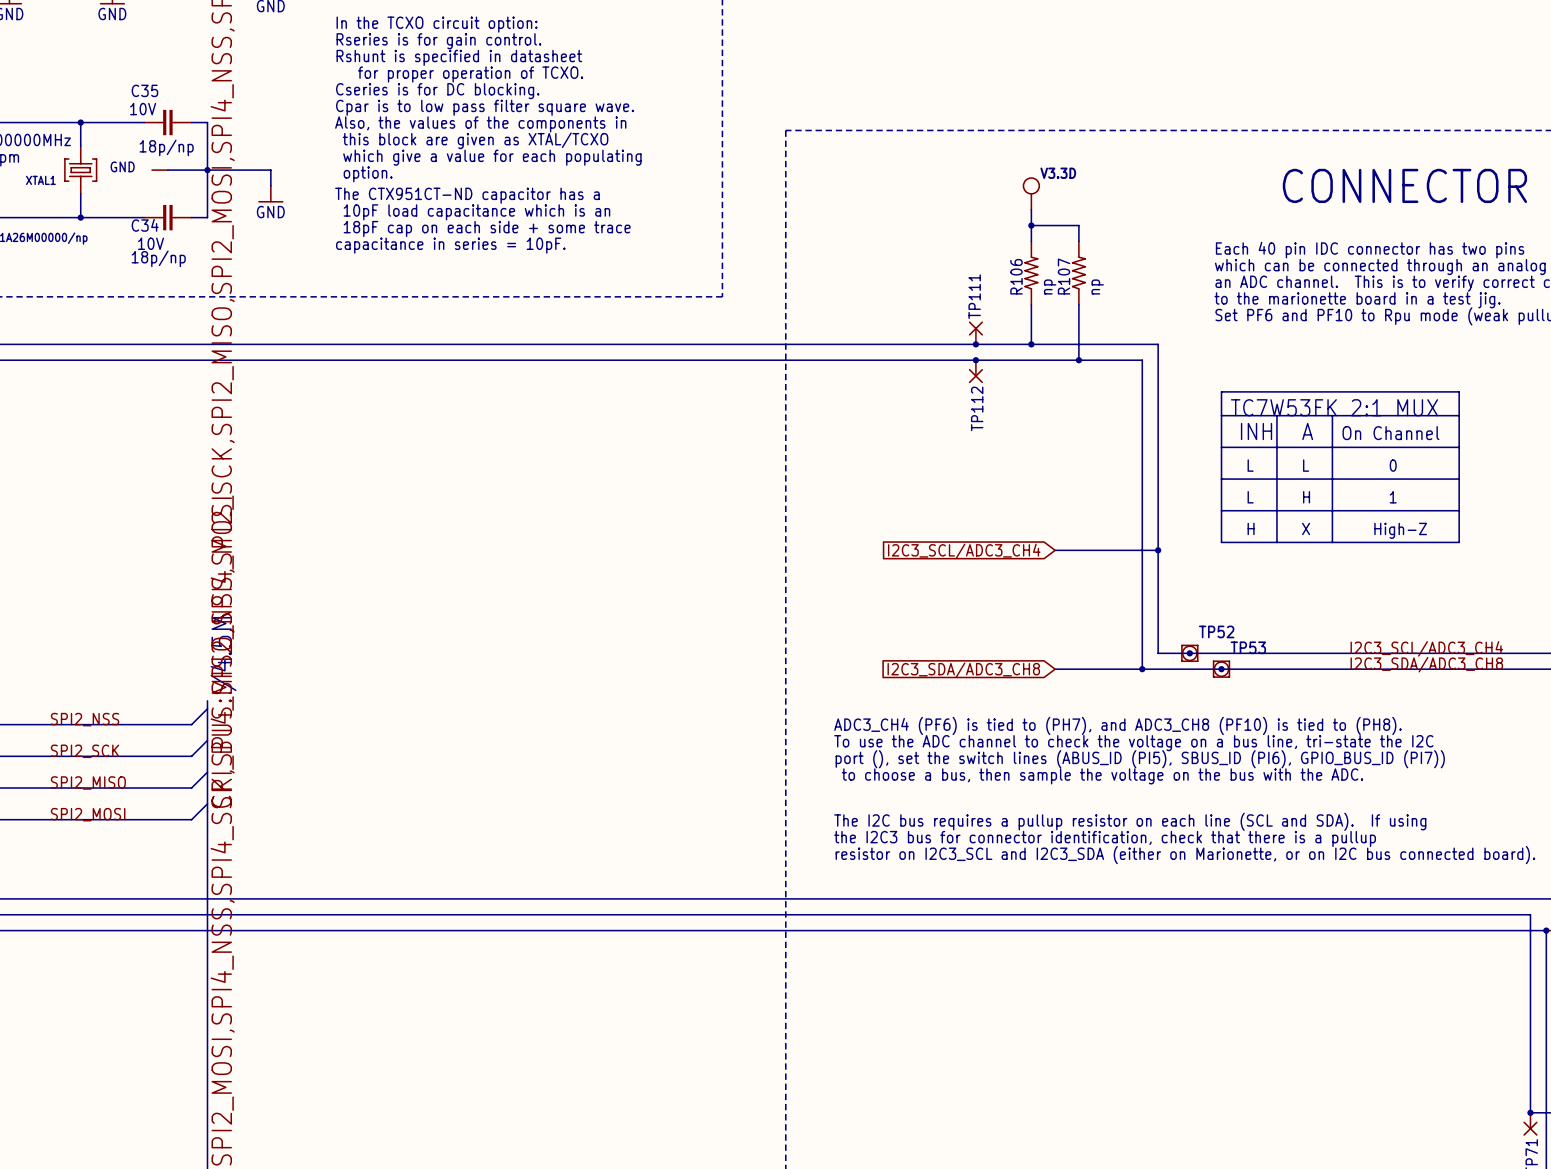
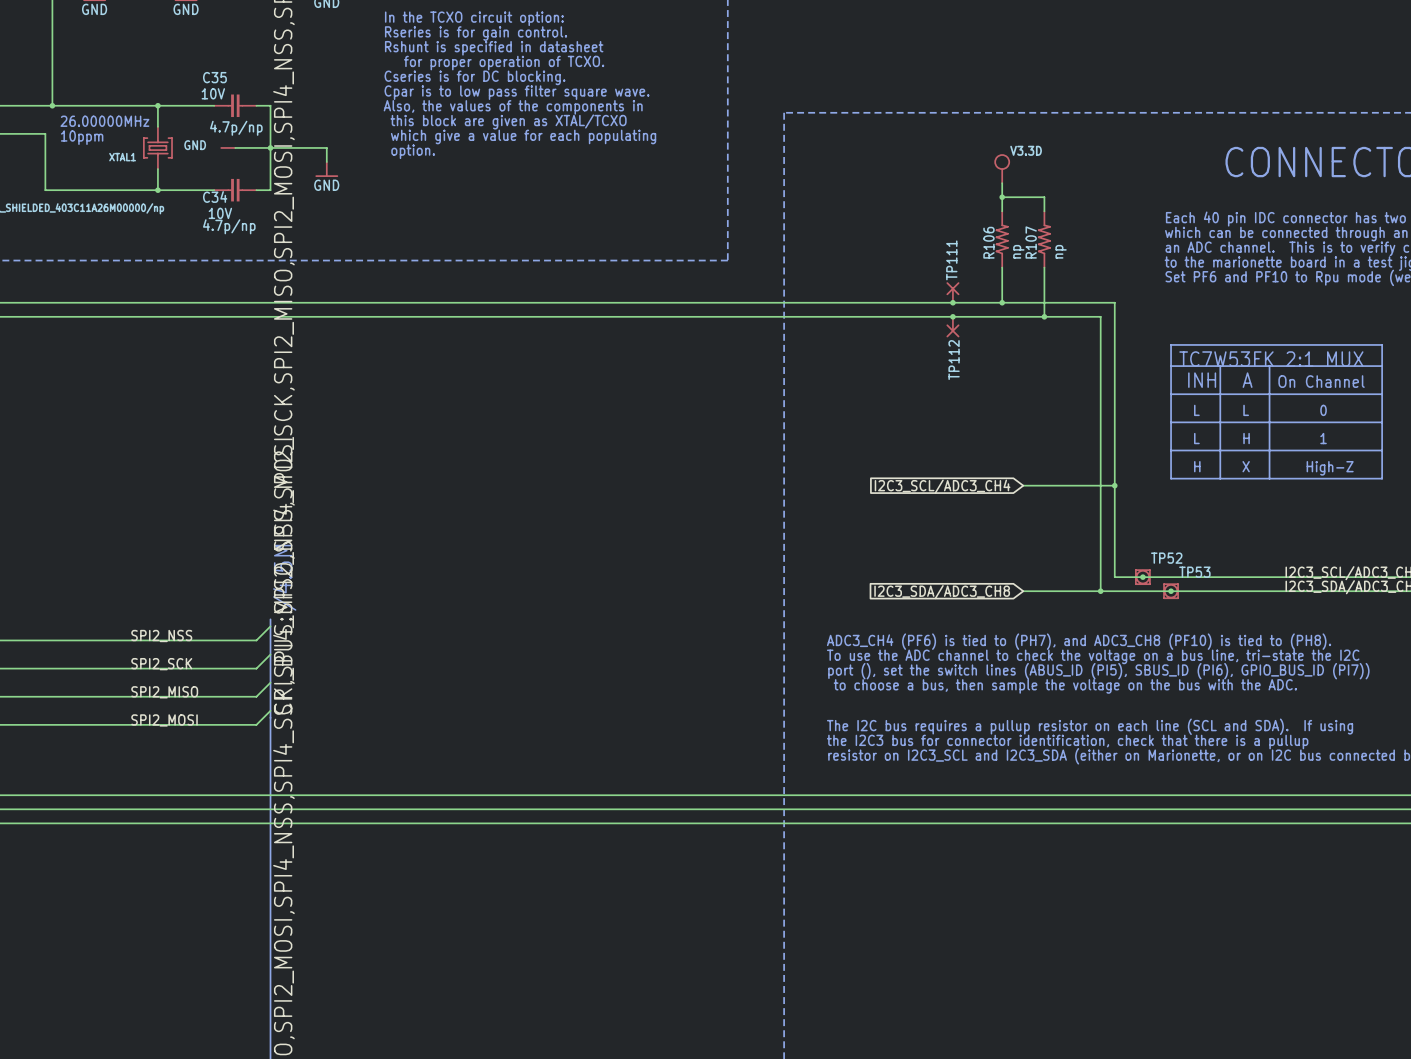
C35 value: 18p/np (166, 147) -> 4.7p/np (236, 128)
text: The CTX951CT-ND capacitor has a (467, 195) -> none
text: 10pF load capacitance which is an (476, 212) -> none
text: 18pF cap on each side + some trace (487, 228) -> none
text: capacitance in series = 10pF. (450, 245) -> none
C34 value: 18p/np (158, 258) -> 4.7p/np (229, 226)

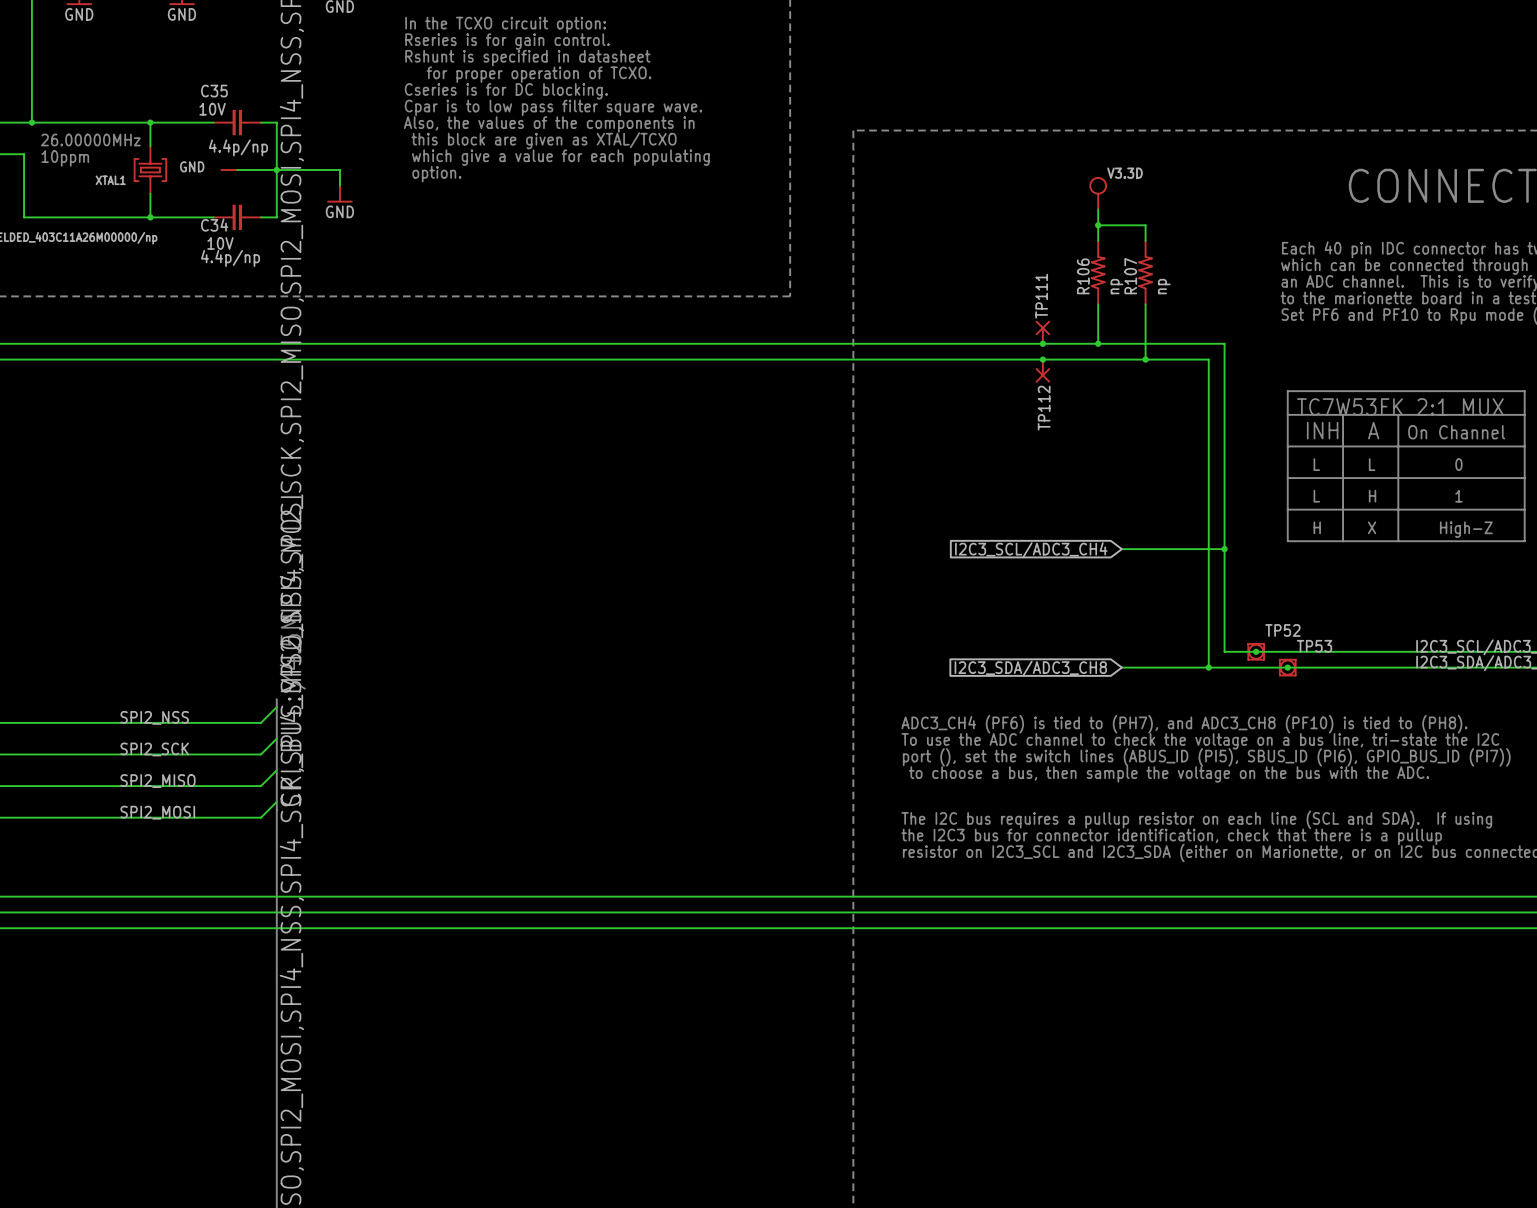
C35 value: 4.7p/np (236, 128) -> 4.4p/np (238, 147)
C34 value: 4.7p/np (229, 226) -> 4.4p/np (230, 258)

